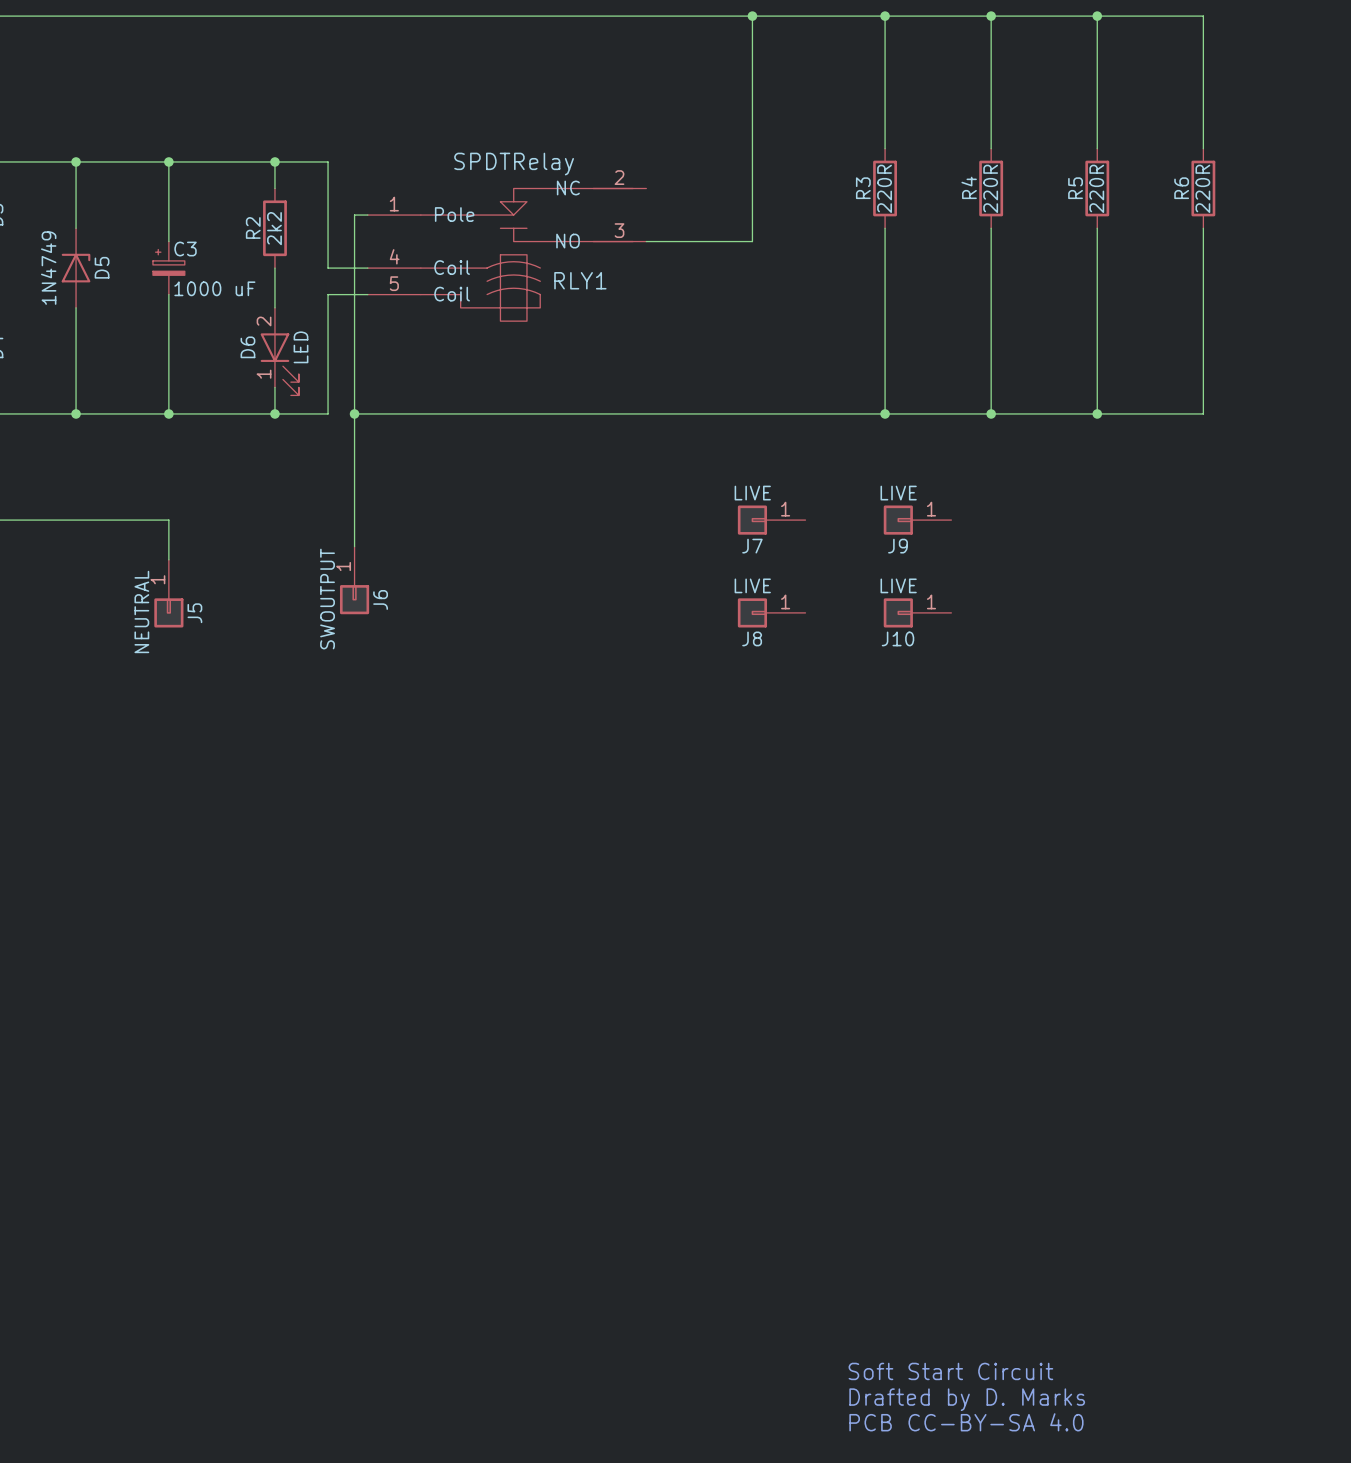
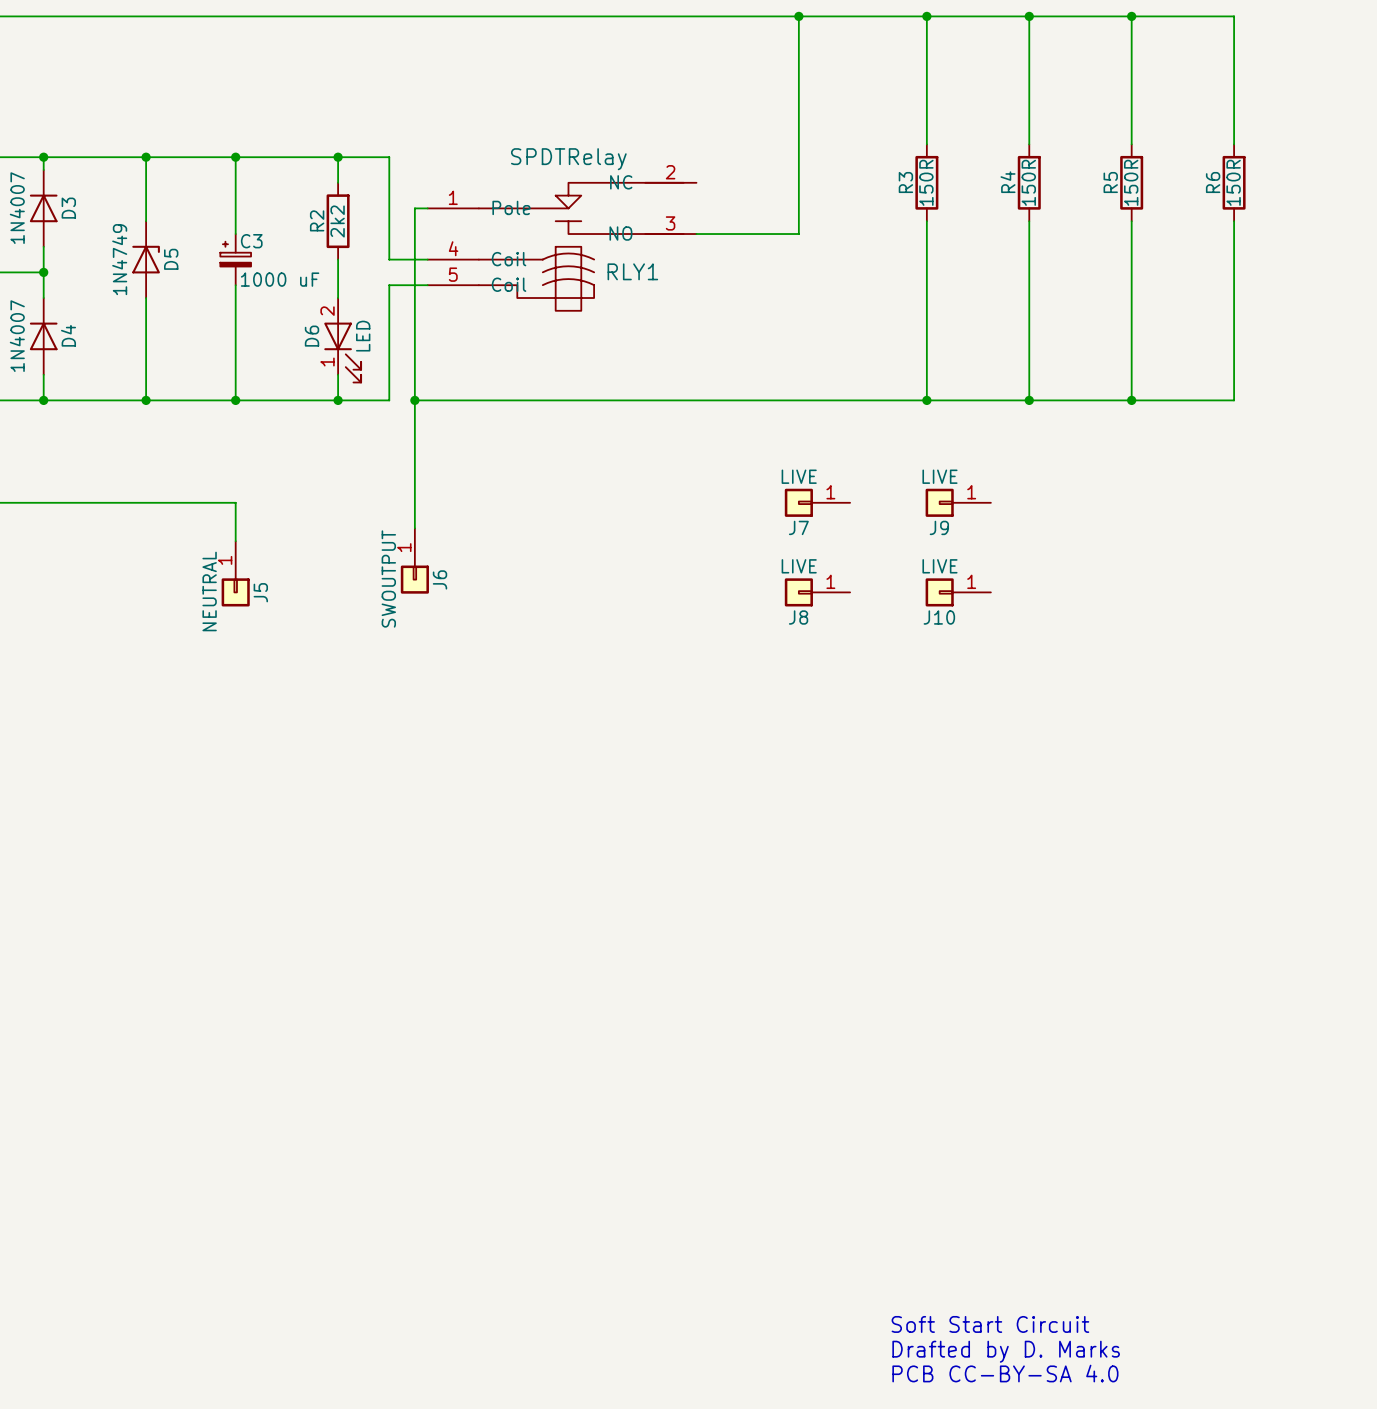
R3 value: 220R (884, 188) -> 150R (926, 182)
R4 value: 220R (990, 188) -> 150R (1028, 182)
R5 value: 220R (1096, 188) -> 150R (1131, 182)
R6 value: 220R (1202, 188) -> 150R (1233, 182)

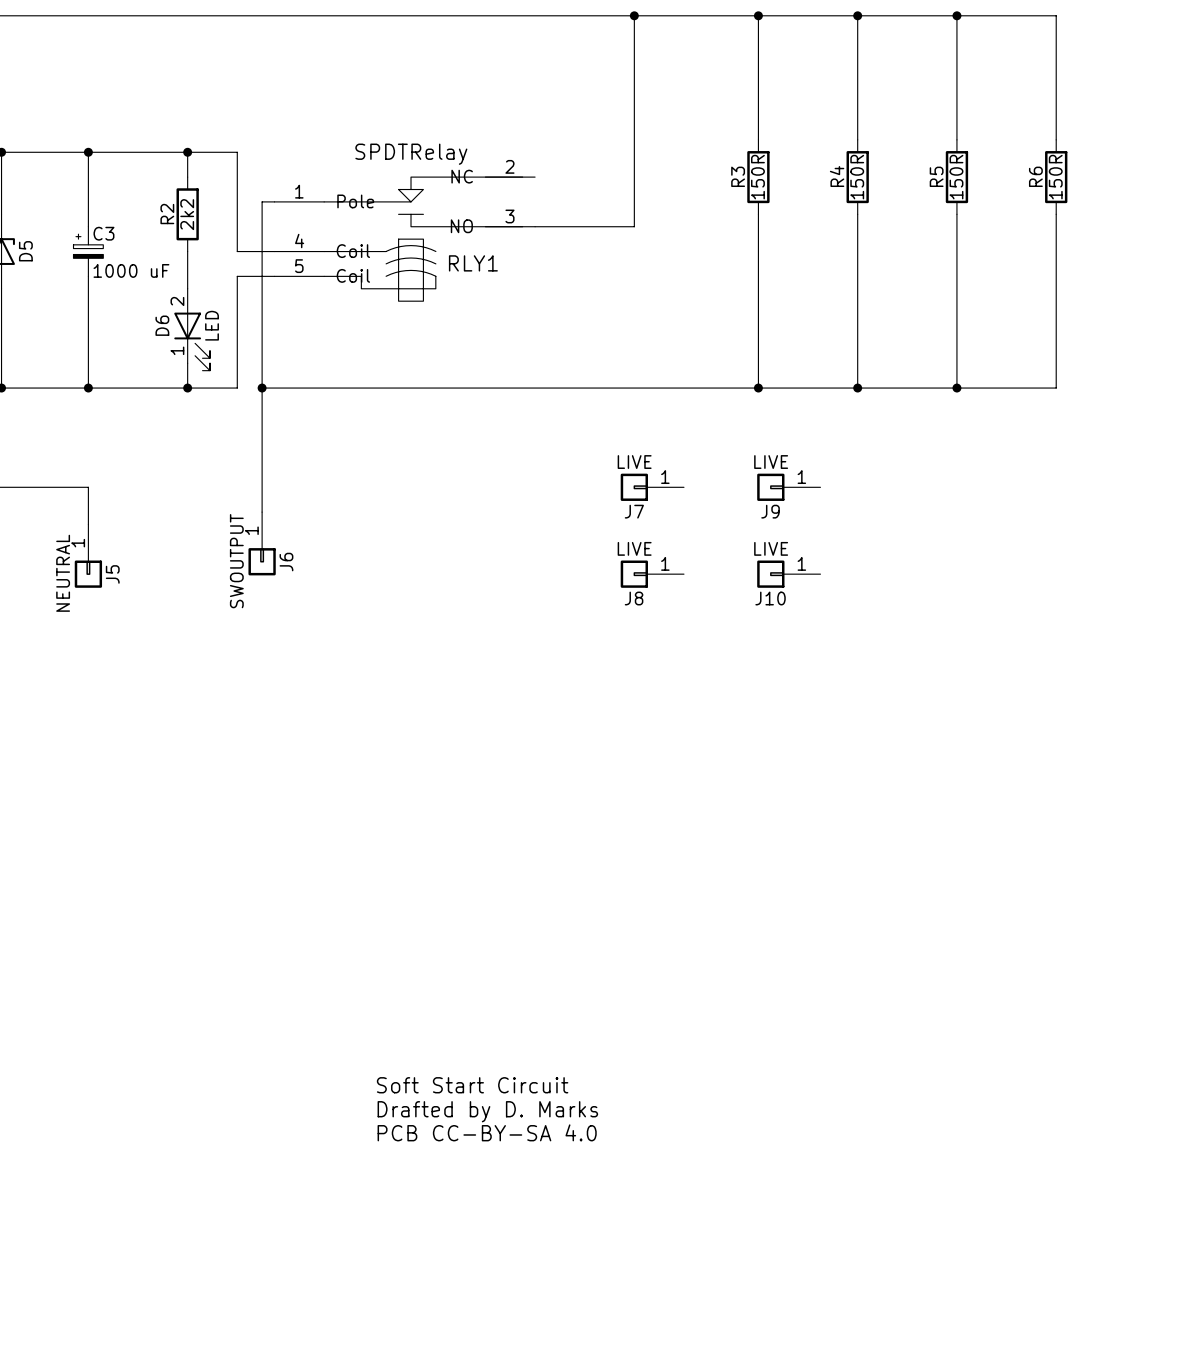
text: none -> Soft Start Circuit (472, 1085)
text: none -> Drafted by D. Marks (487, 1111)
text: none -> PCB CC-BY-SA 4.0 (487, 1132)
text: Soft Start Circuit (990, 1324) -> none
text: Drafted by D. Marks (1006, 1351) -> none
text: PCB CC-BY-SA 4.0 (1005, 1373) -> none

